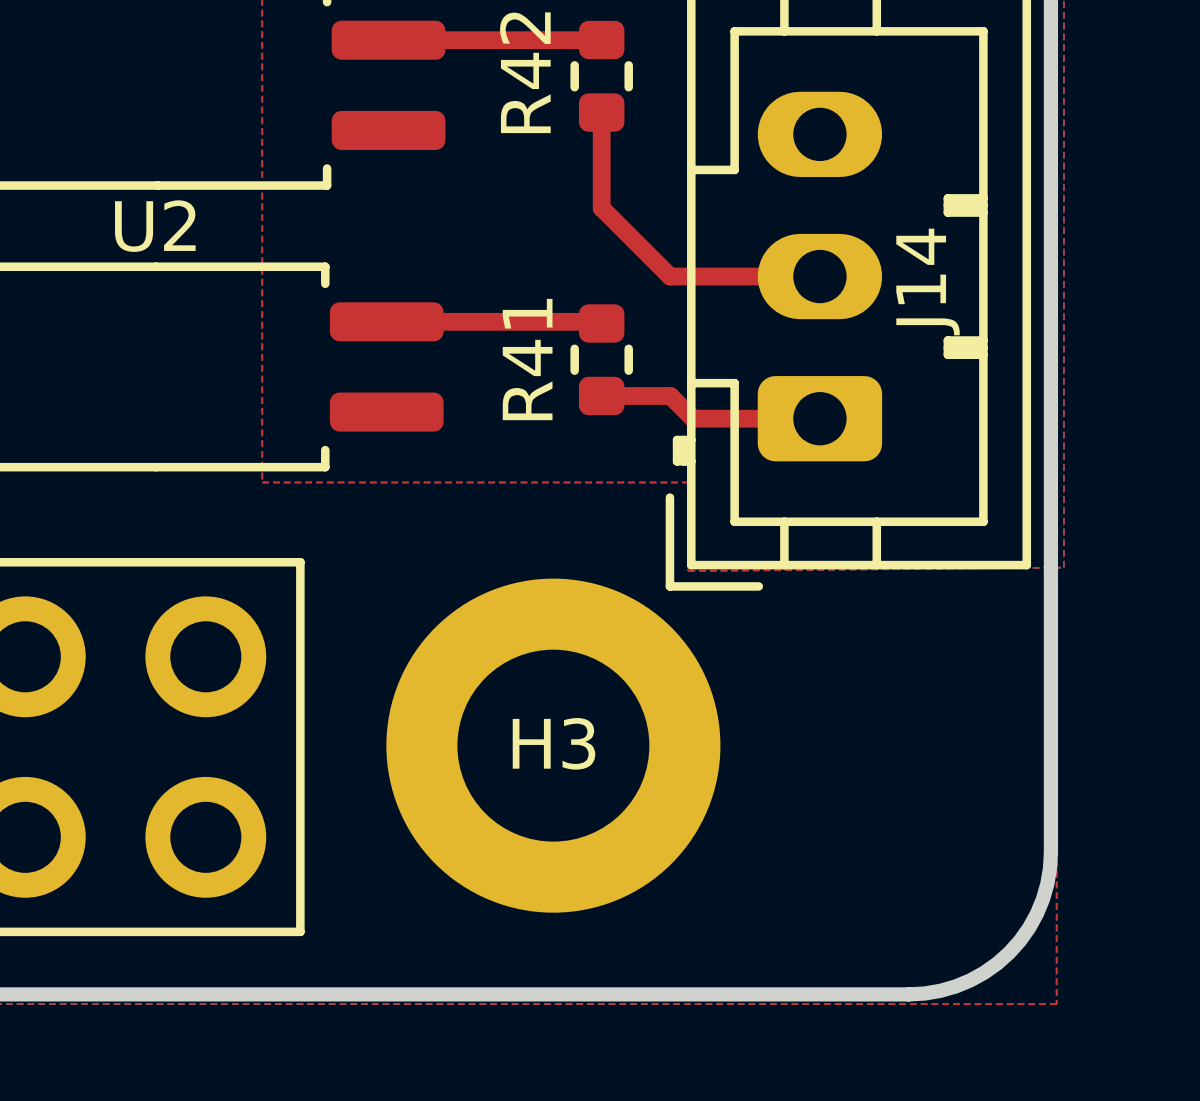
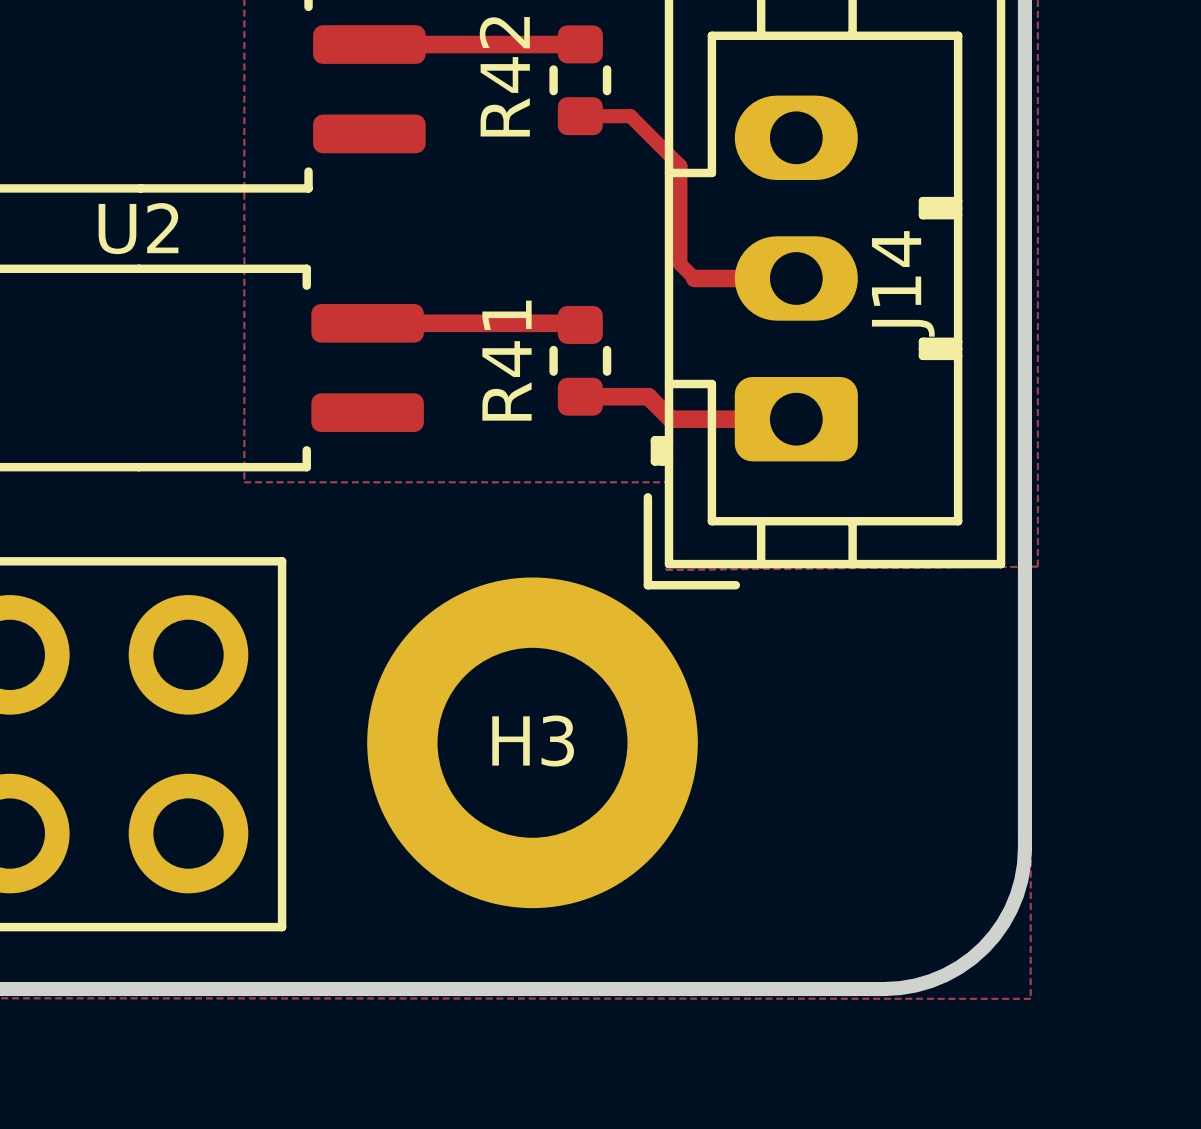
top track: (601, 112) (601, 208) (670, 276) (717, 276) -> (580, 116) (630, 116) (680, 166) (680, 264) (694, 278)

